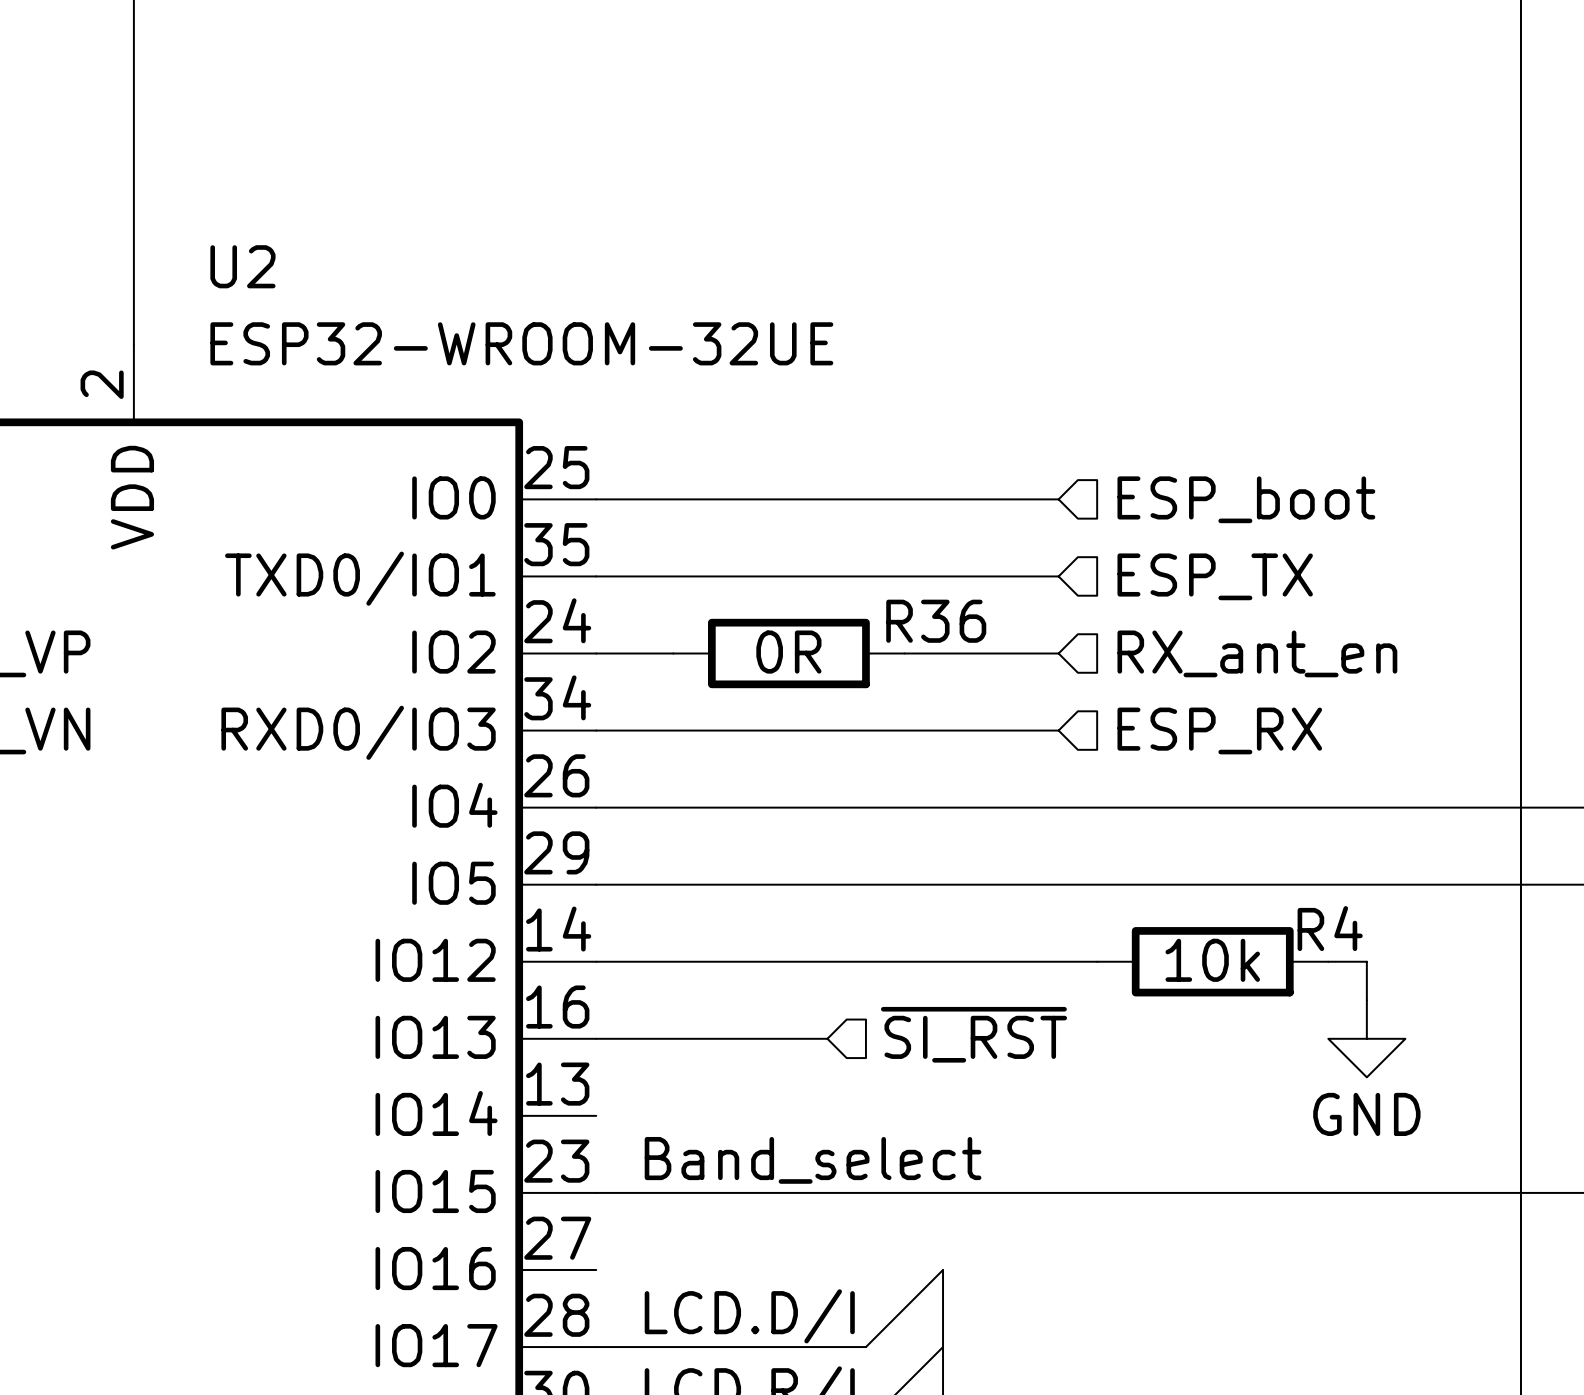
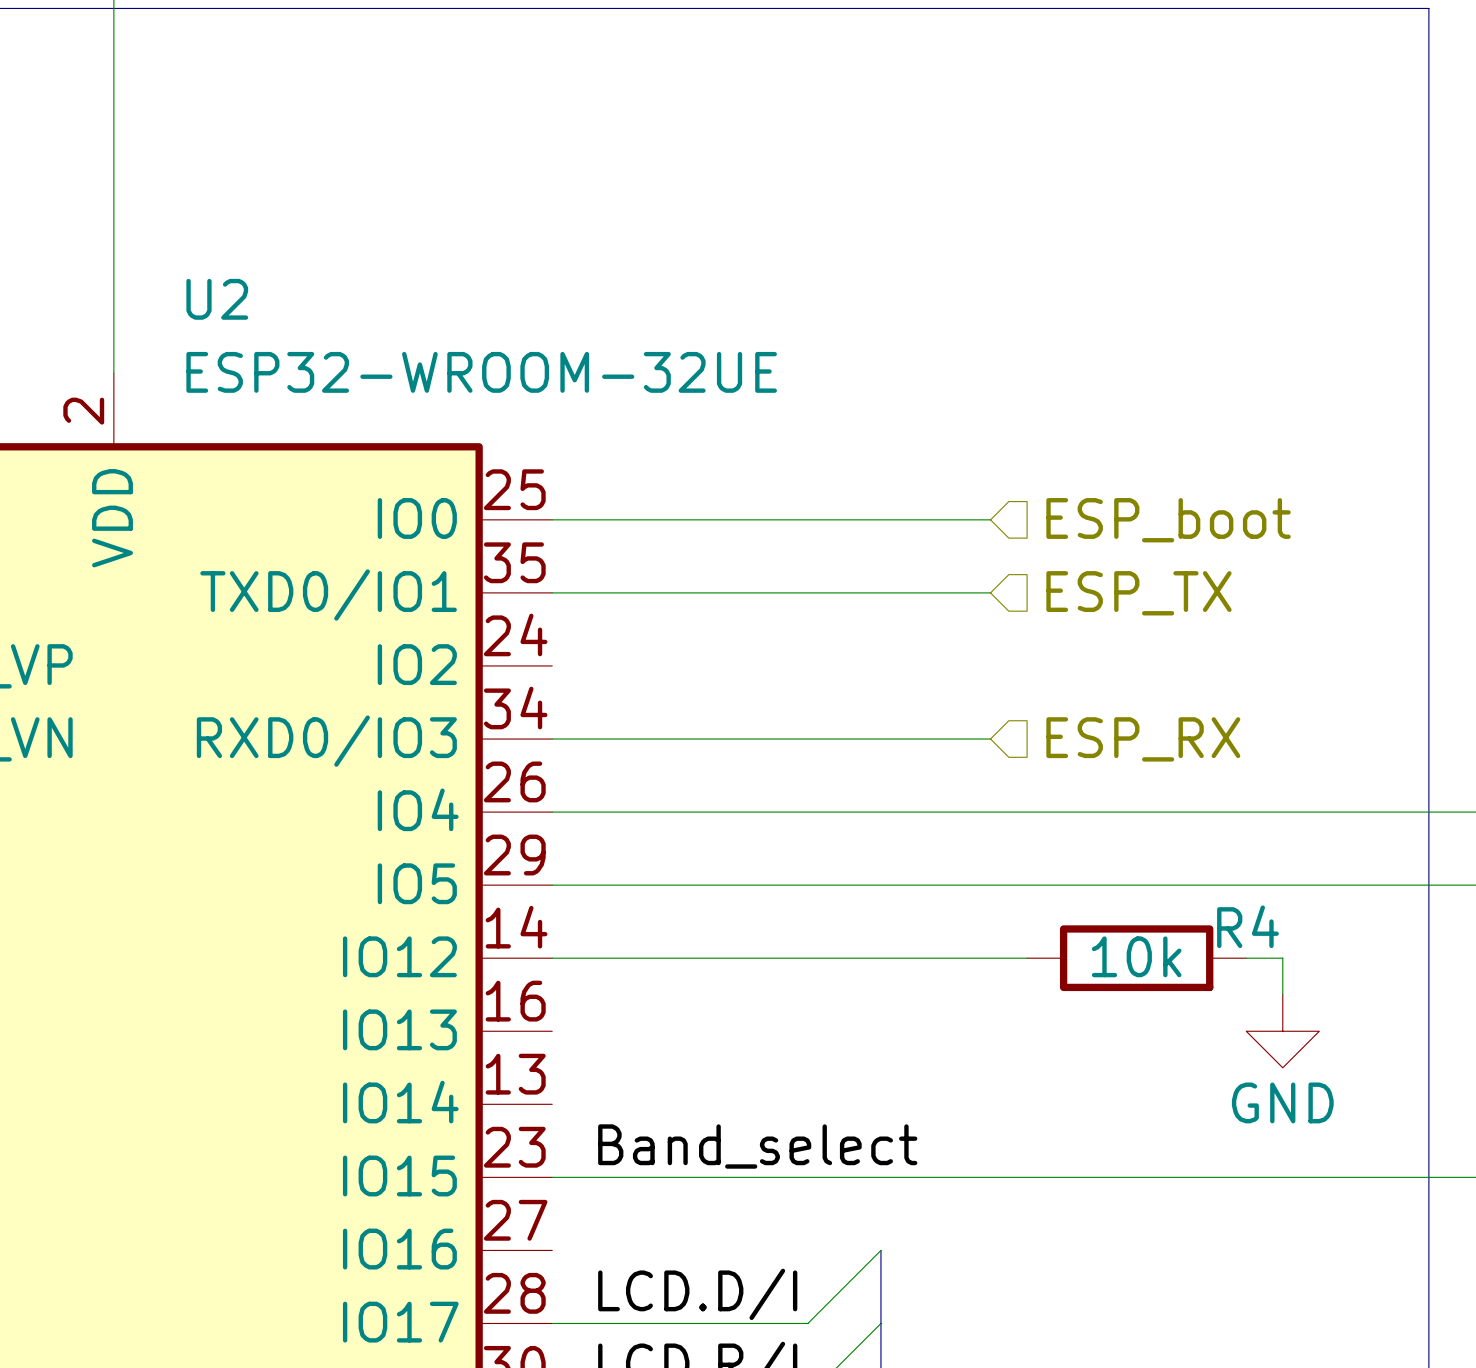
wire: (596, 653) (673, 653) -> none
R36: 0R (788, 653) -> none
wire: (904, 653) (1058, 653) -> none
hierarchical label: RX_ant_en (1257, 653) -> none
hierarchical label: ~{SI_RST} (974, 1034) -> none
wire: (596, 1038) (827, 1038) -> none

